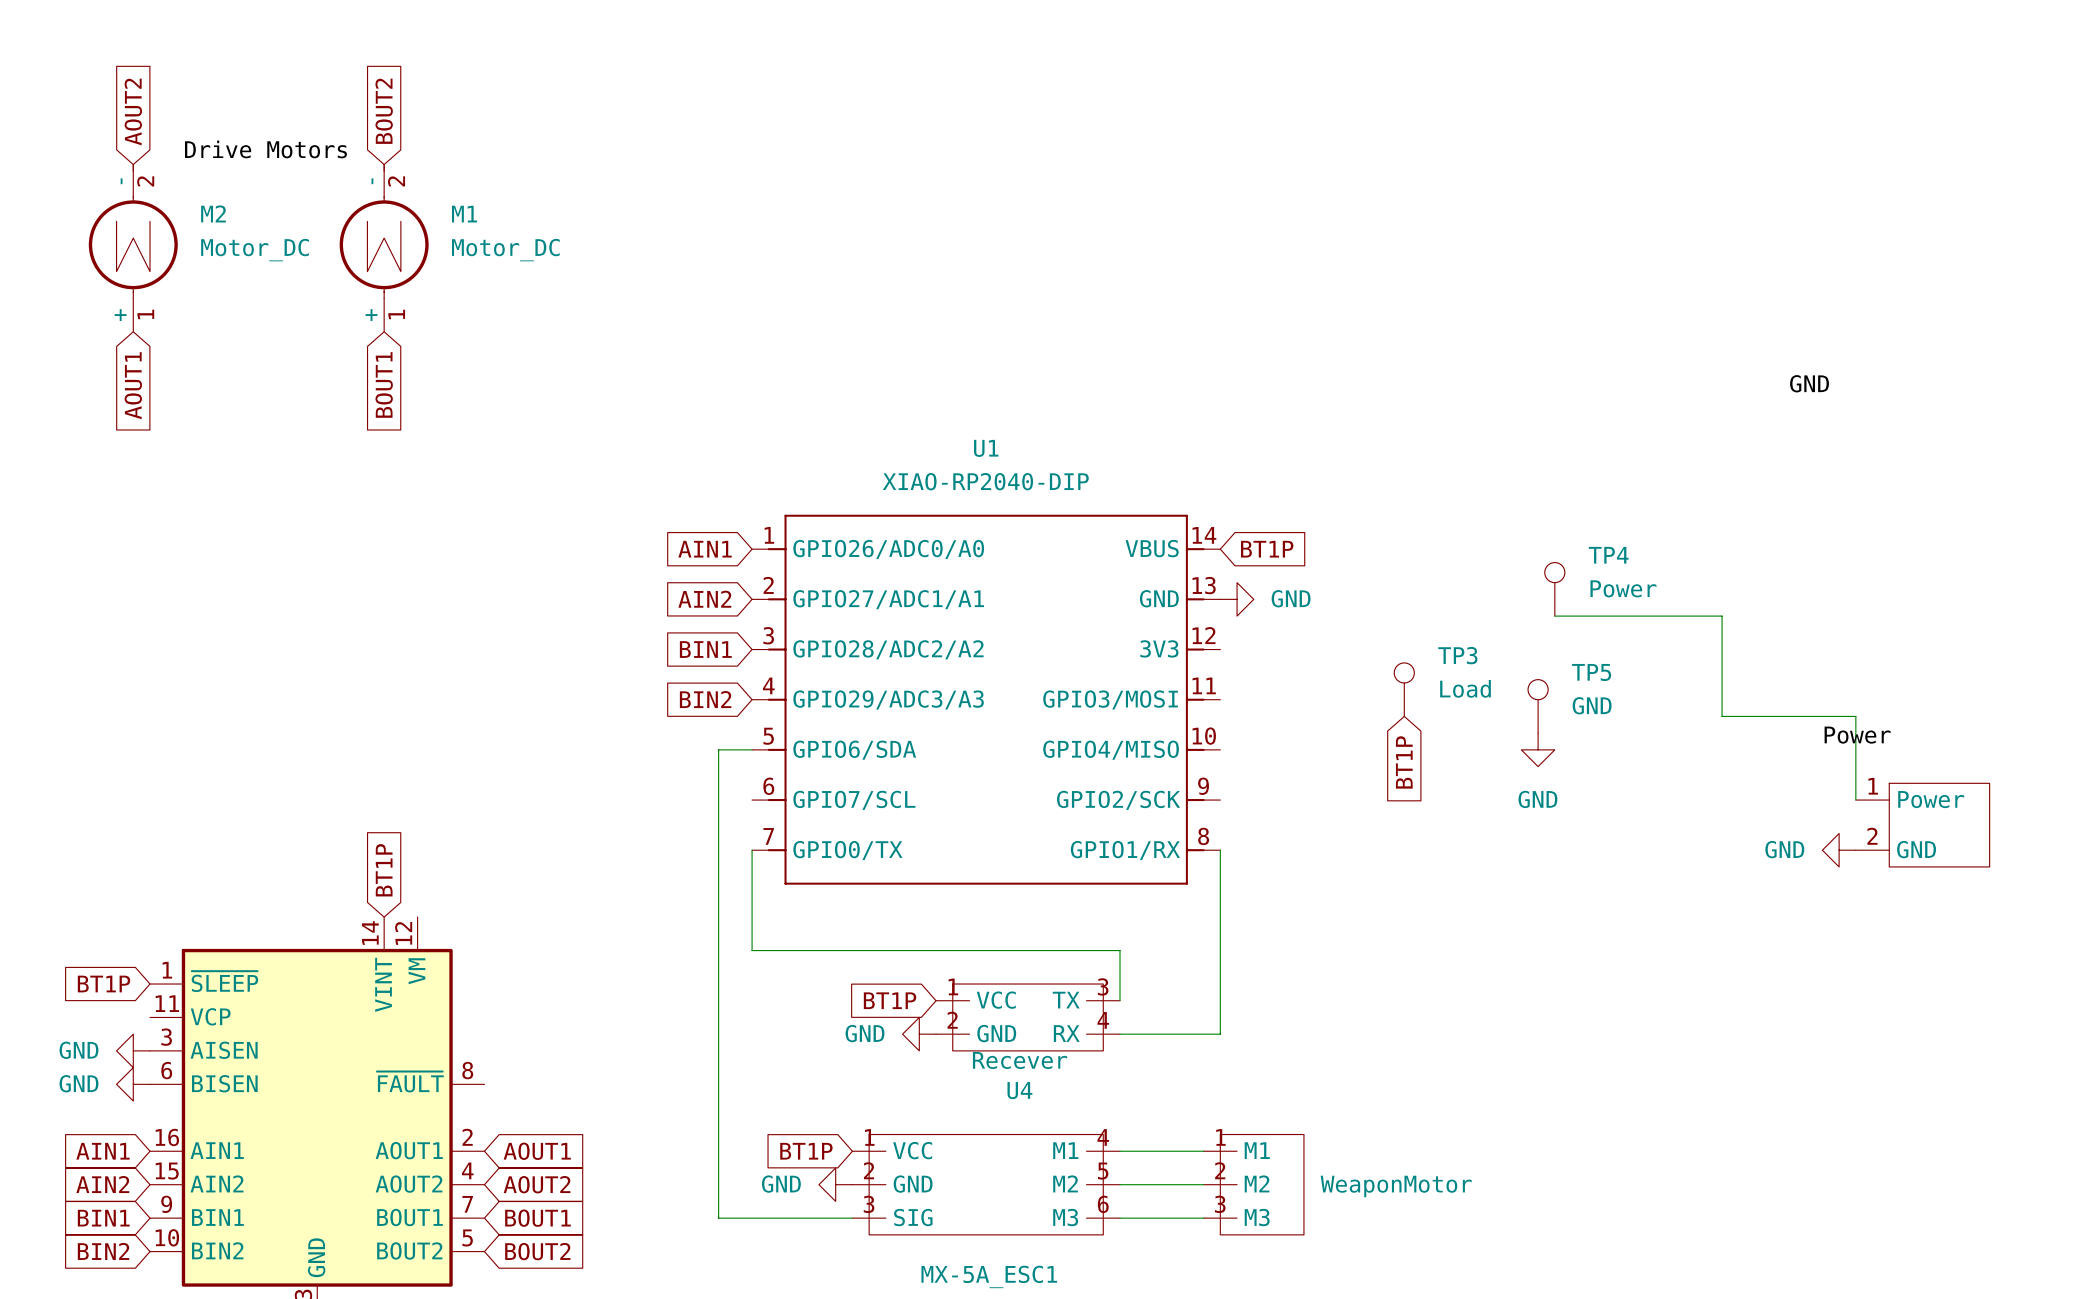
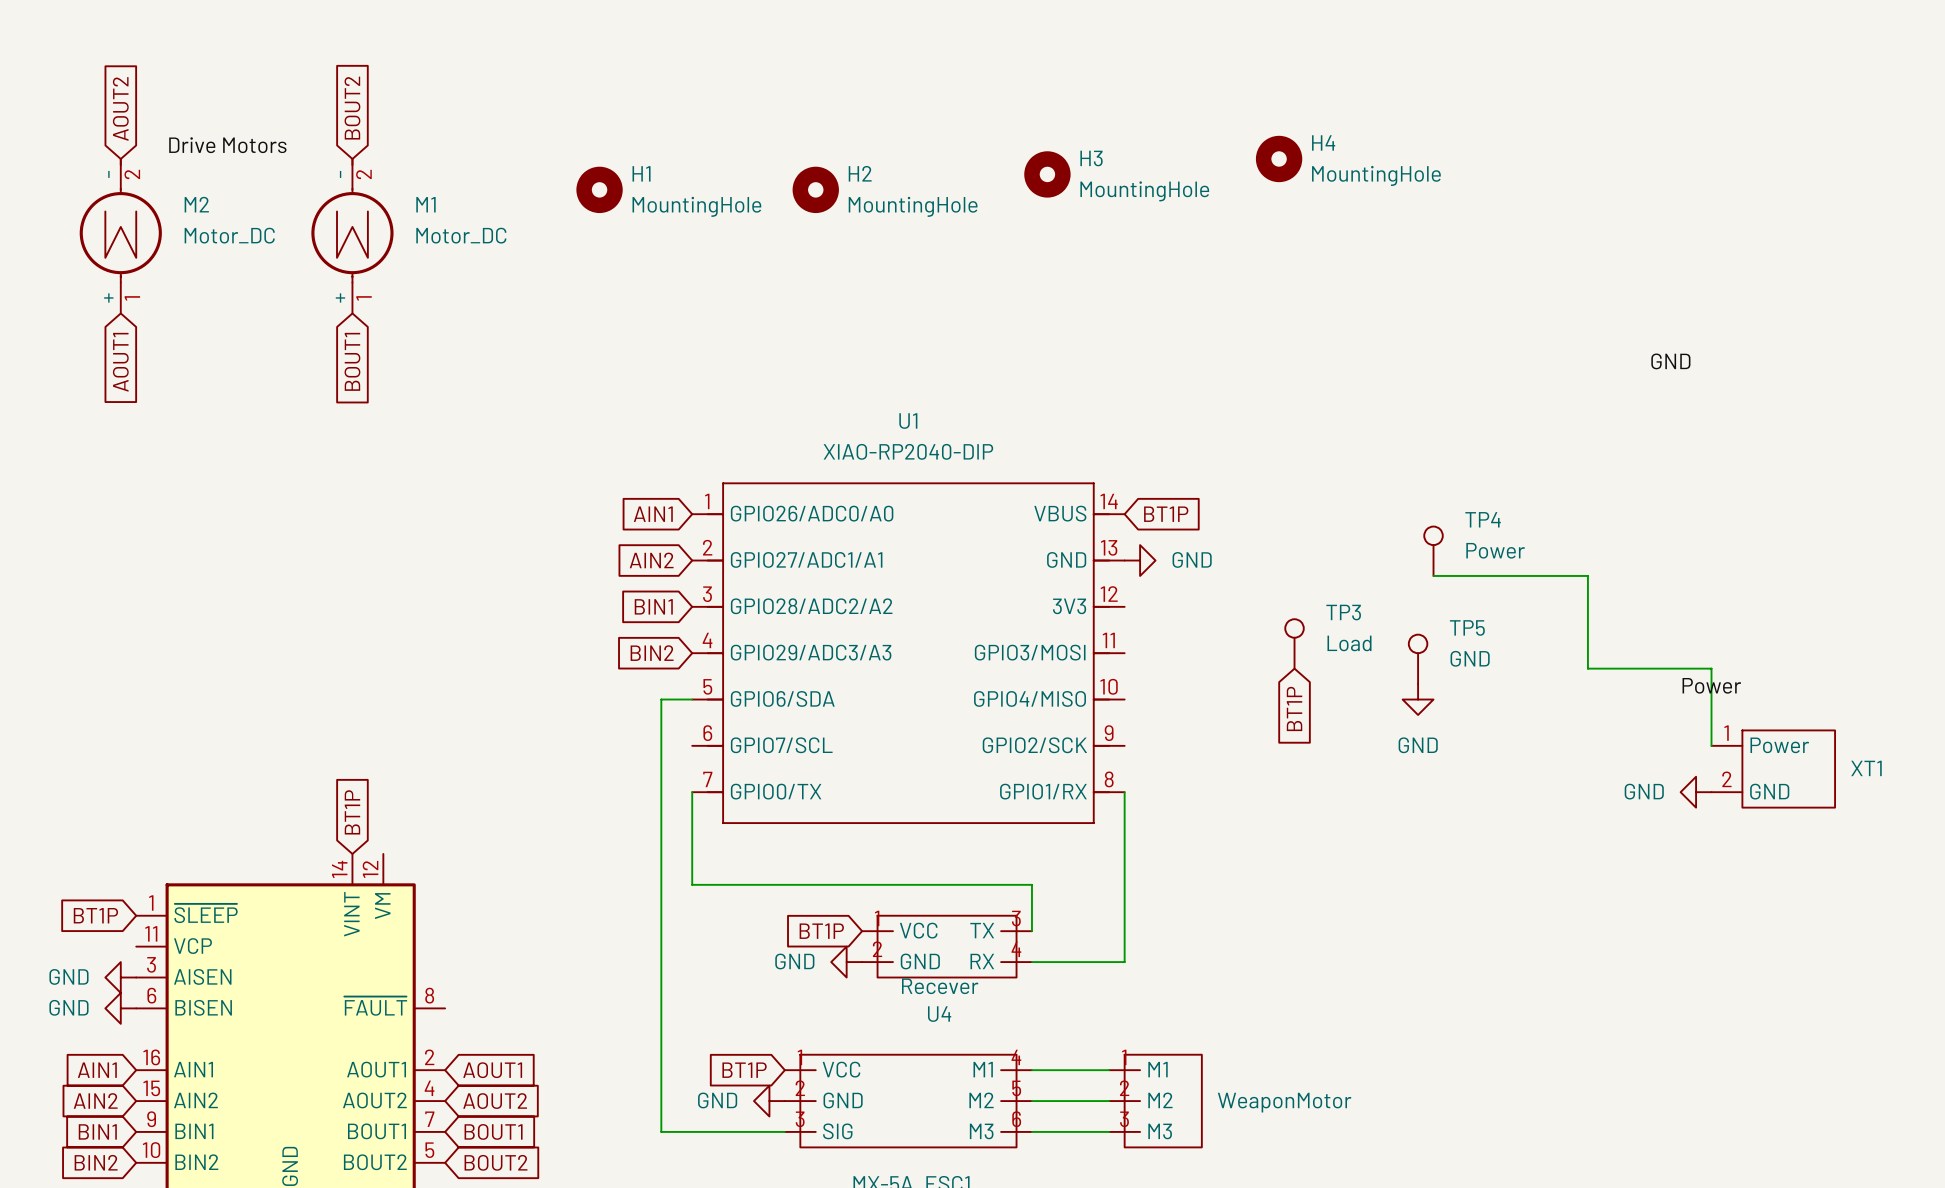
H4: none -> MountingHole (1279, 158)
H3: none -> MountingHole (1047, 174)
H1: none -> MountingHole (599, 189)
H2: none -> MountingHole (815, 189)
XT1 name: none -> XT1 (1866, 768)

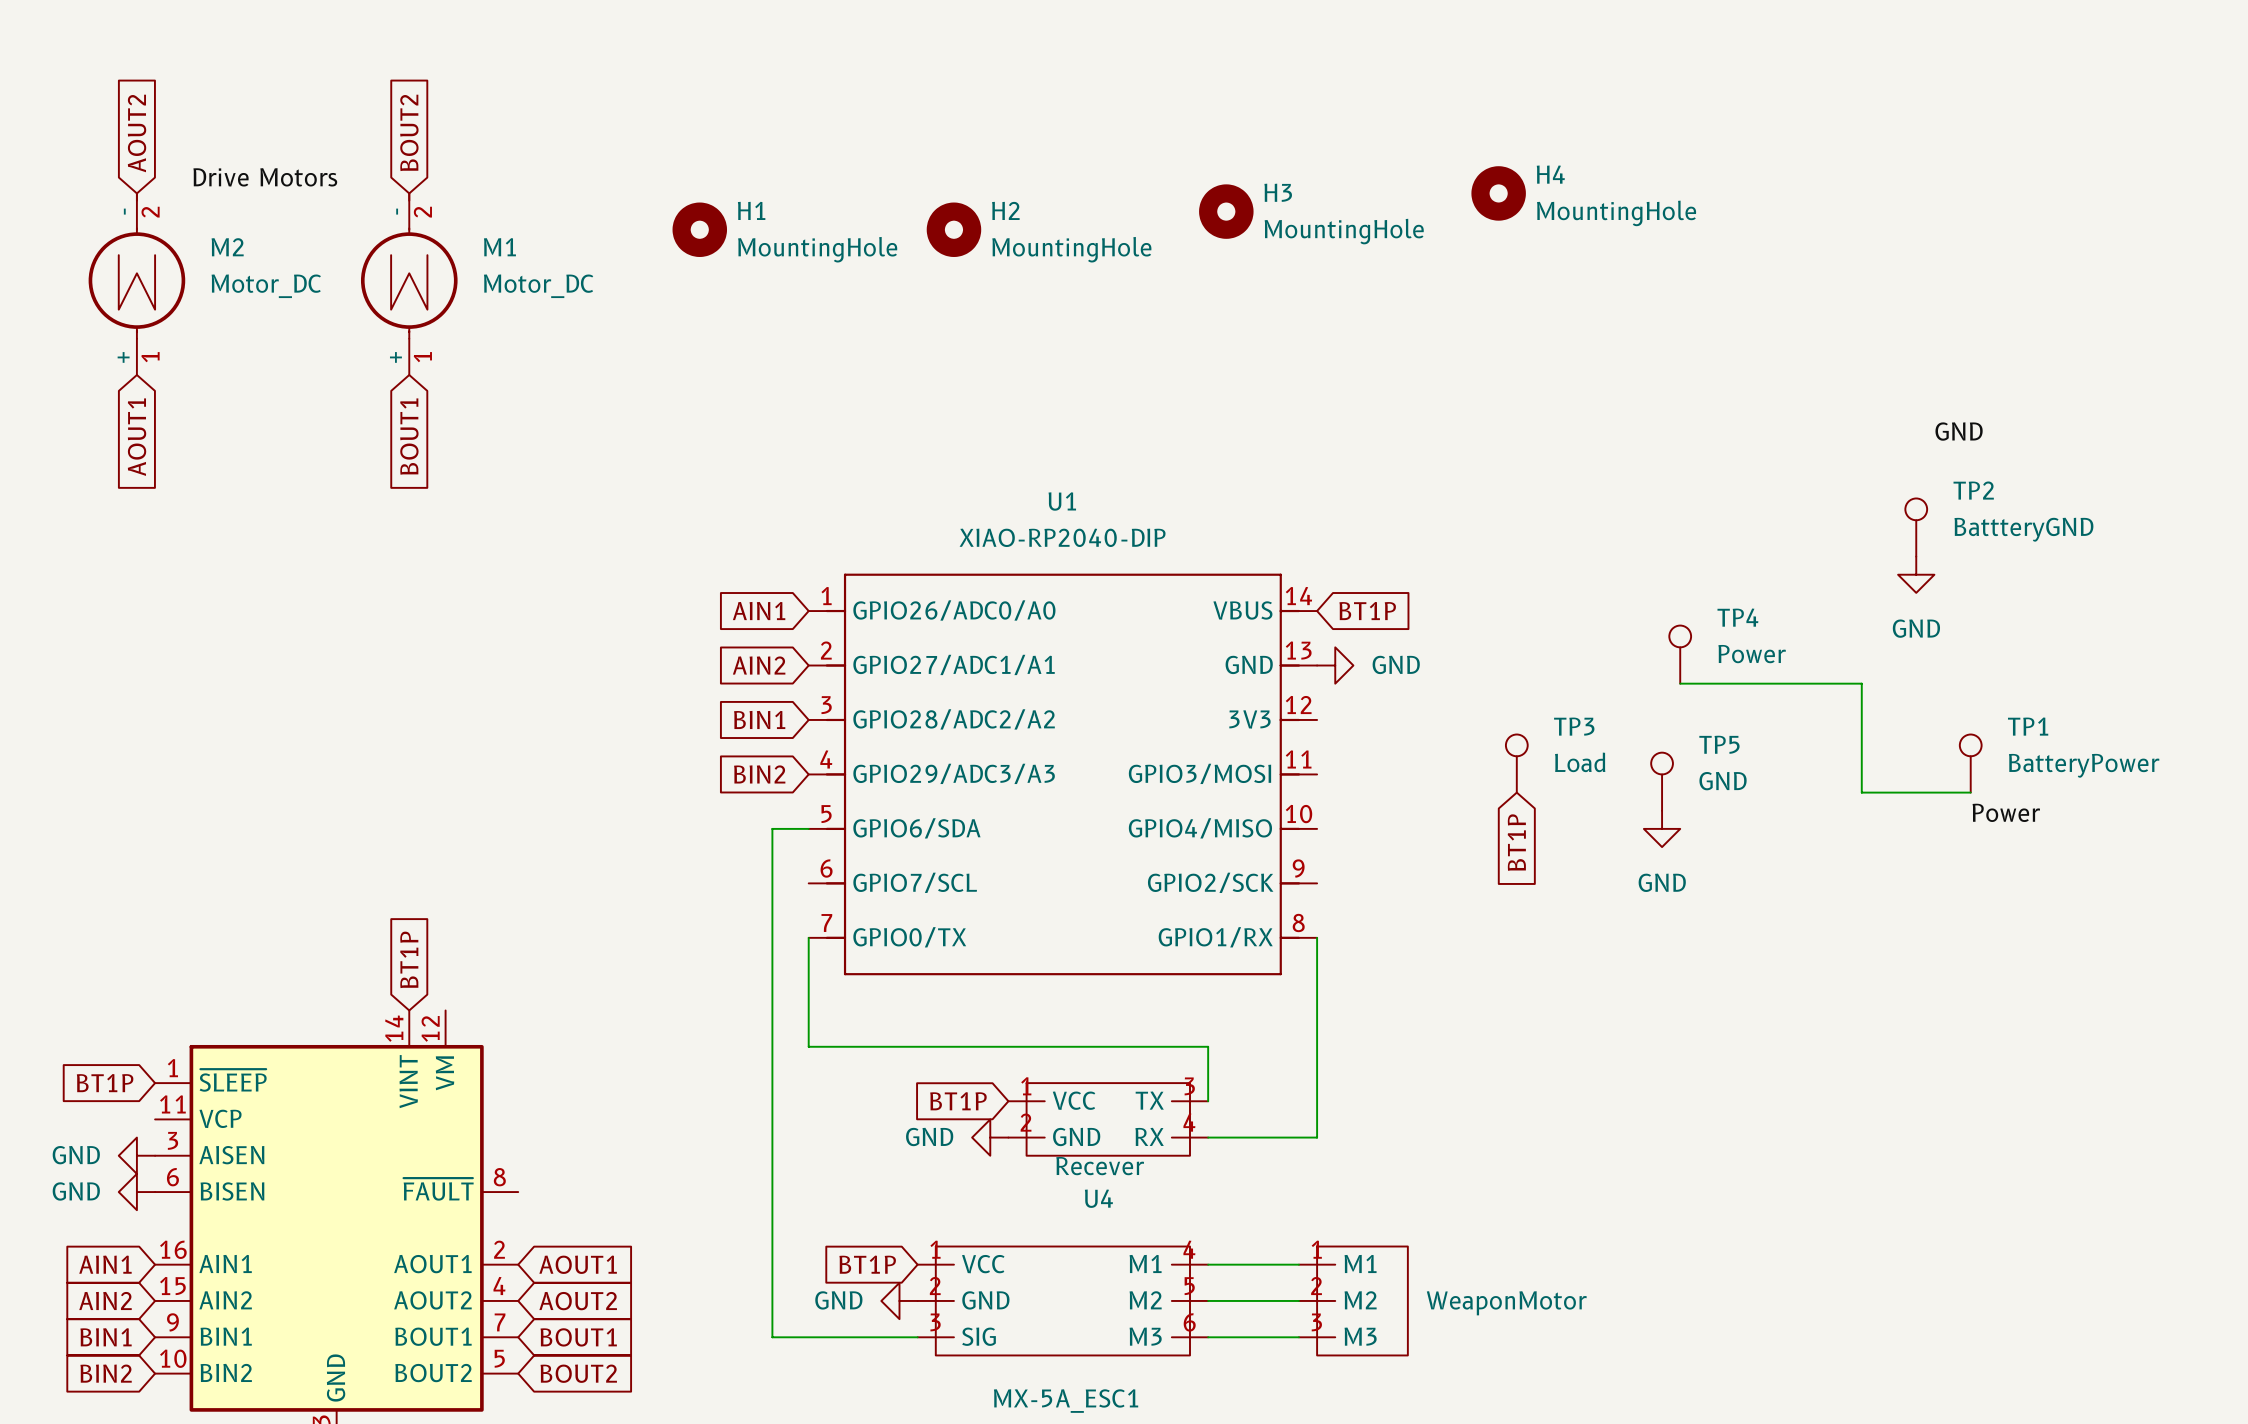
TP2: none -> BattteryGND (1916, 527)
power symbol: none -> GND (1916, 574)
TP1: none -> BatteryPower (1970, 763)
wire: (1680, 668) (1711, 668) (1711, 745) -> none
XT1: (1773, 769) -> none
power symbol: GND (1696, 792) -> none

